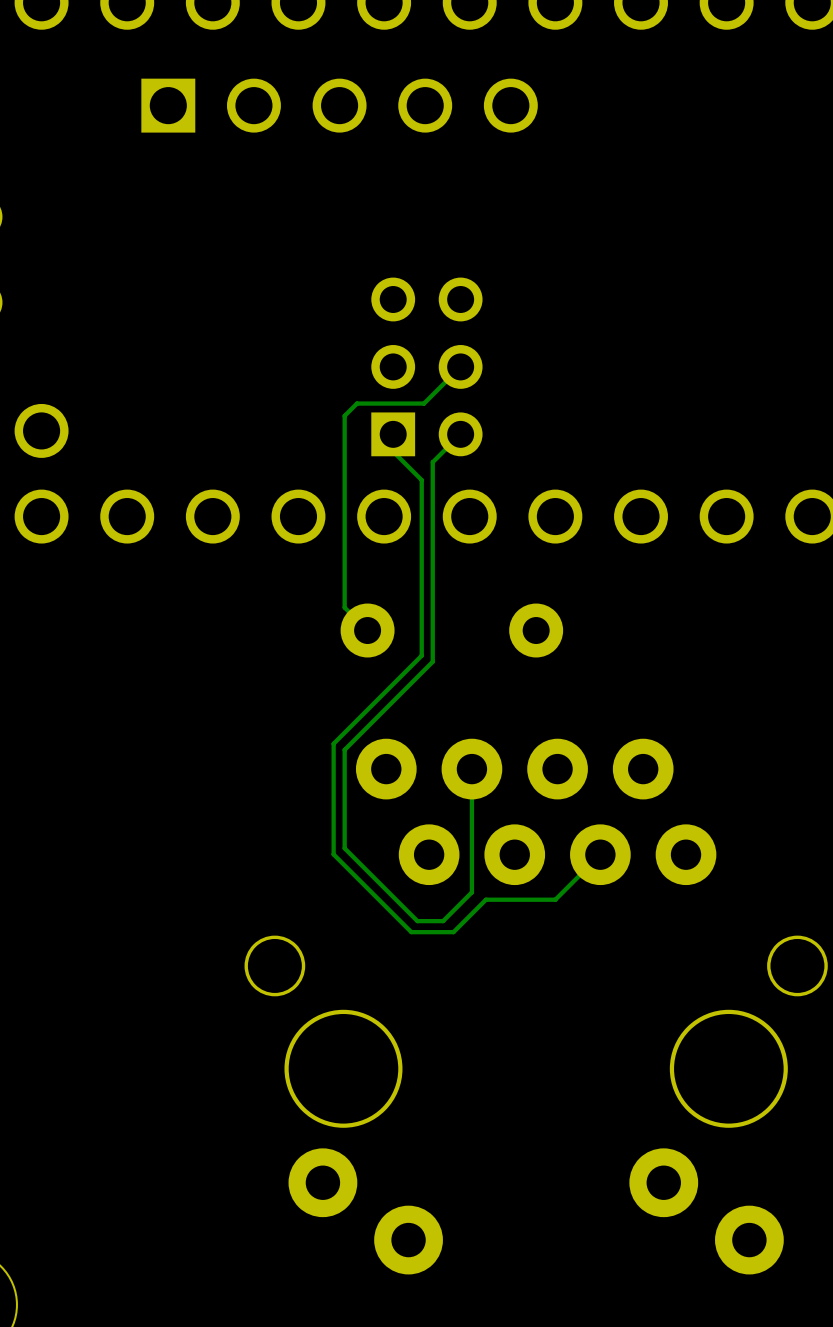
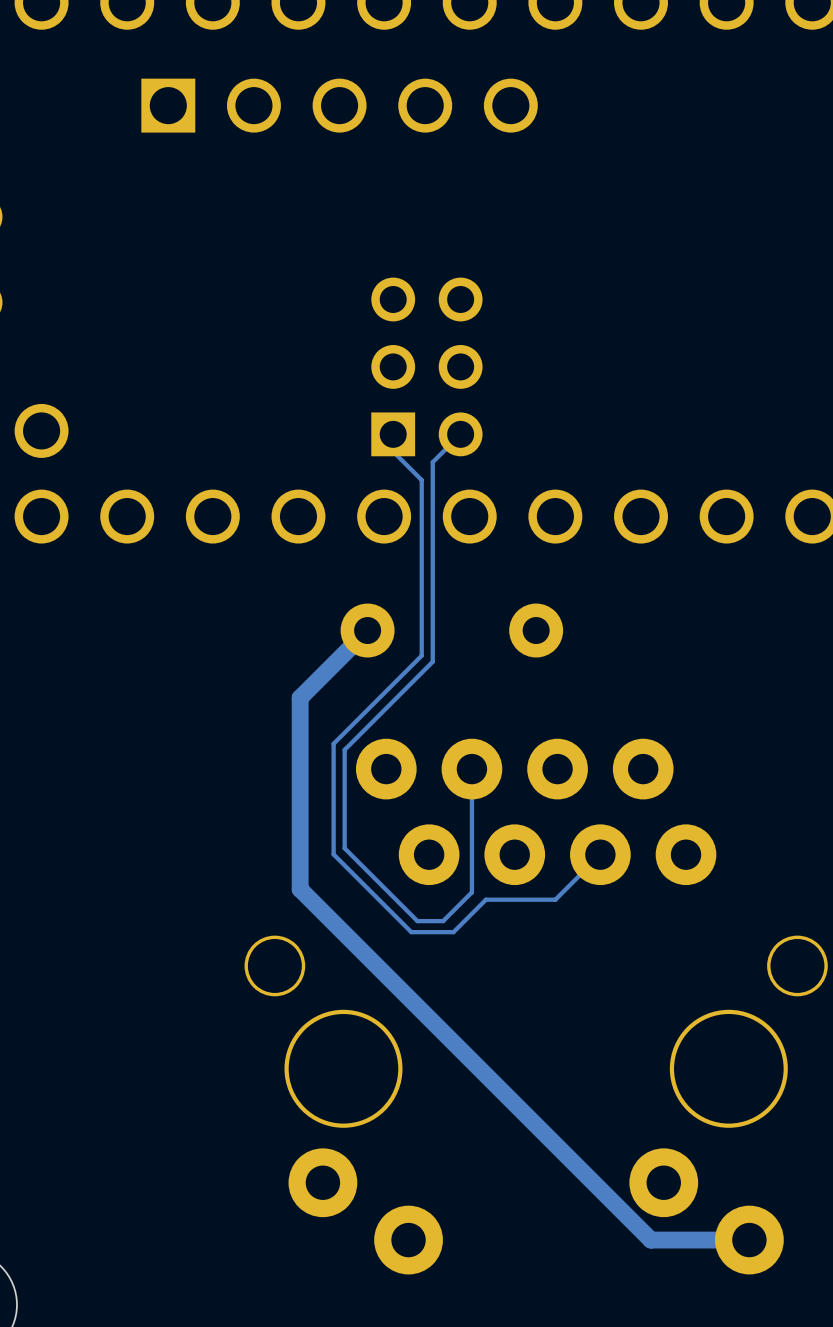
track: (460, 366) (424, 403) (357, 403) (344, 415) (344, 607) (367, 630) -> (749, 1240) (650, 1240) (300, 889) (300, 697) (367, 630)

